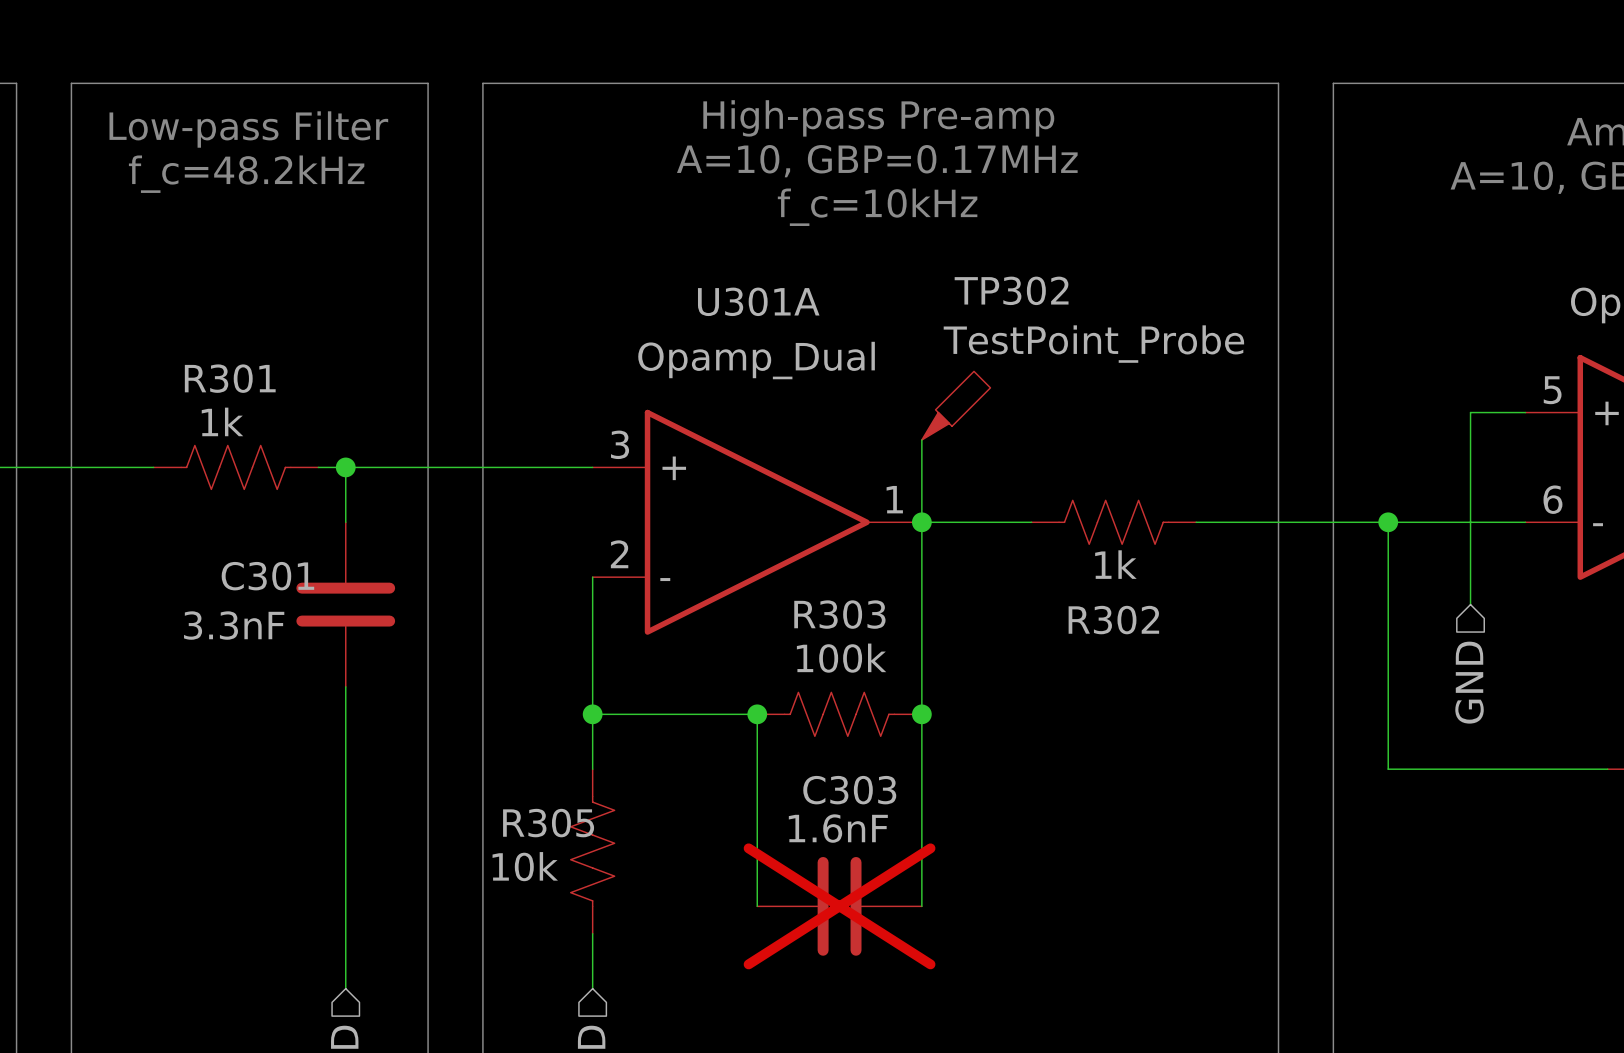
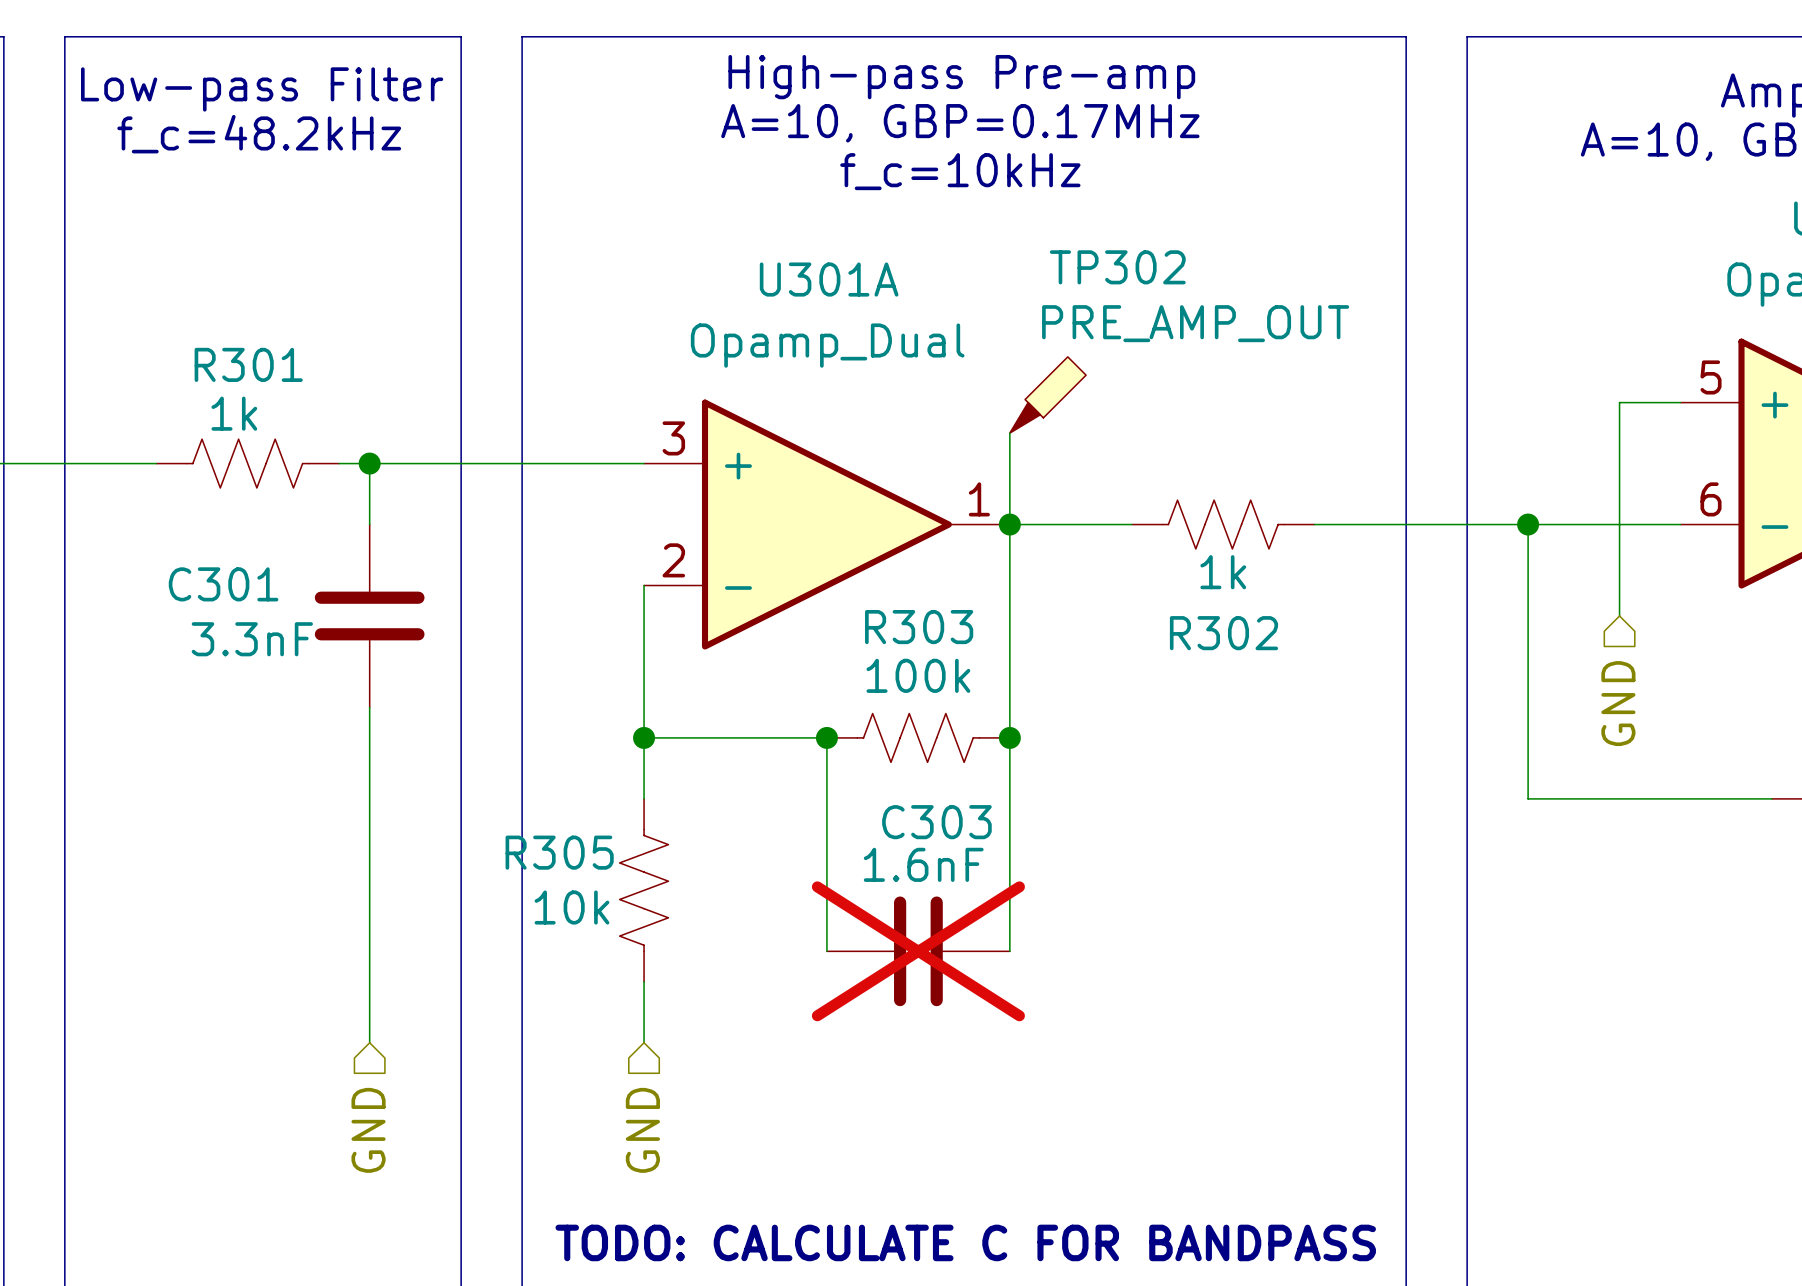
TP302 value: TestPoint_Probe (1093, 344) -> PRE_AMP_OUT (1195, 323)
C301 name position: C301 (267, 576) -> C301 (223, 584)
R305 name position: R305 (548, 823) -> R305 (559, 852)

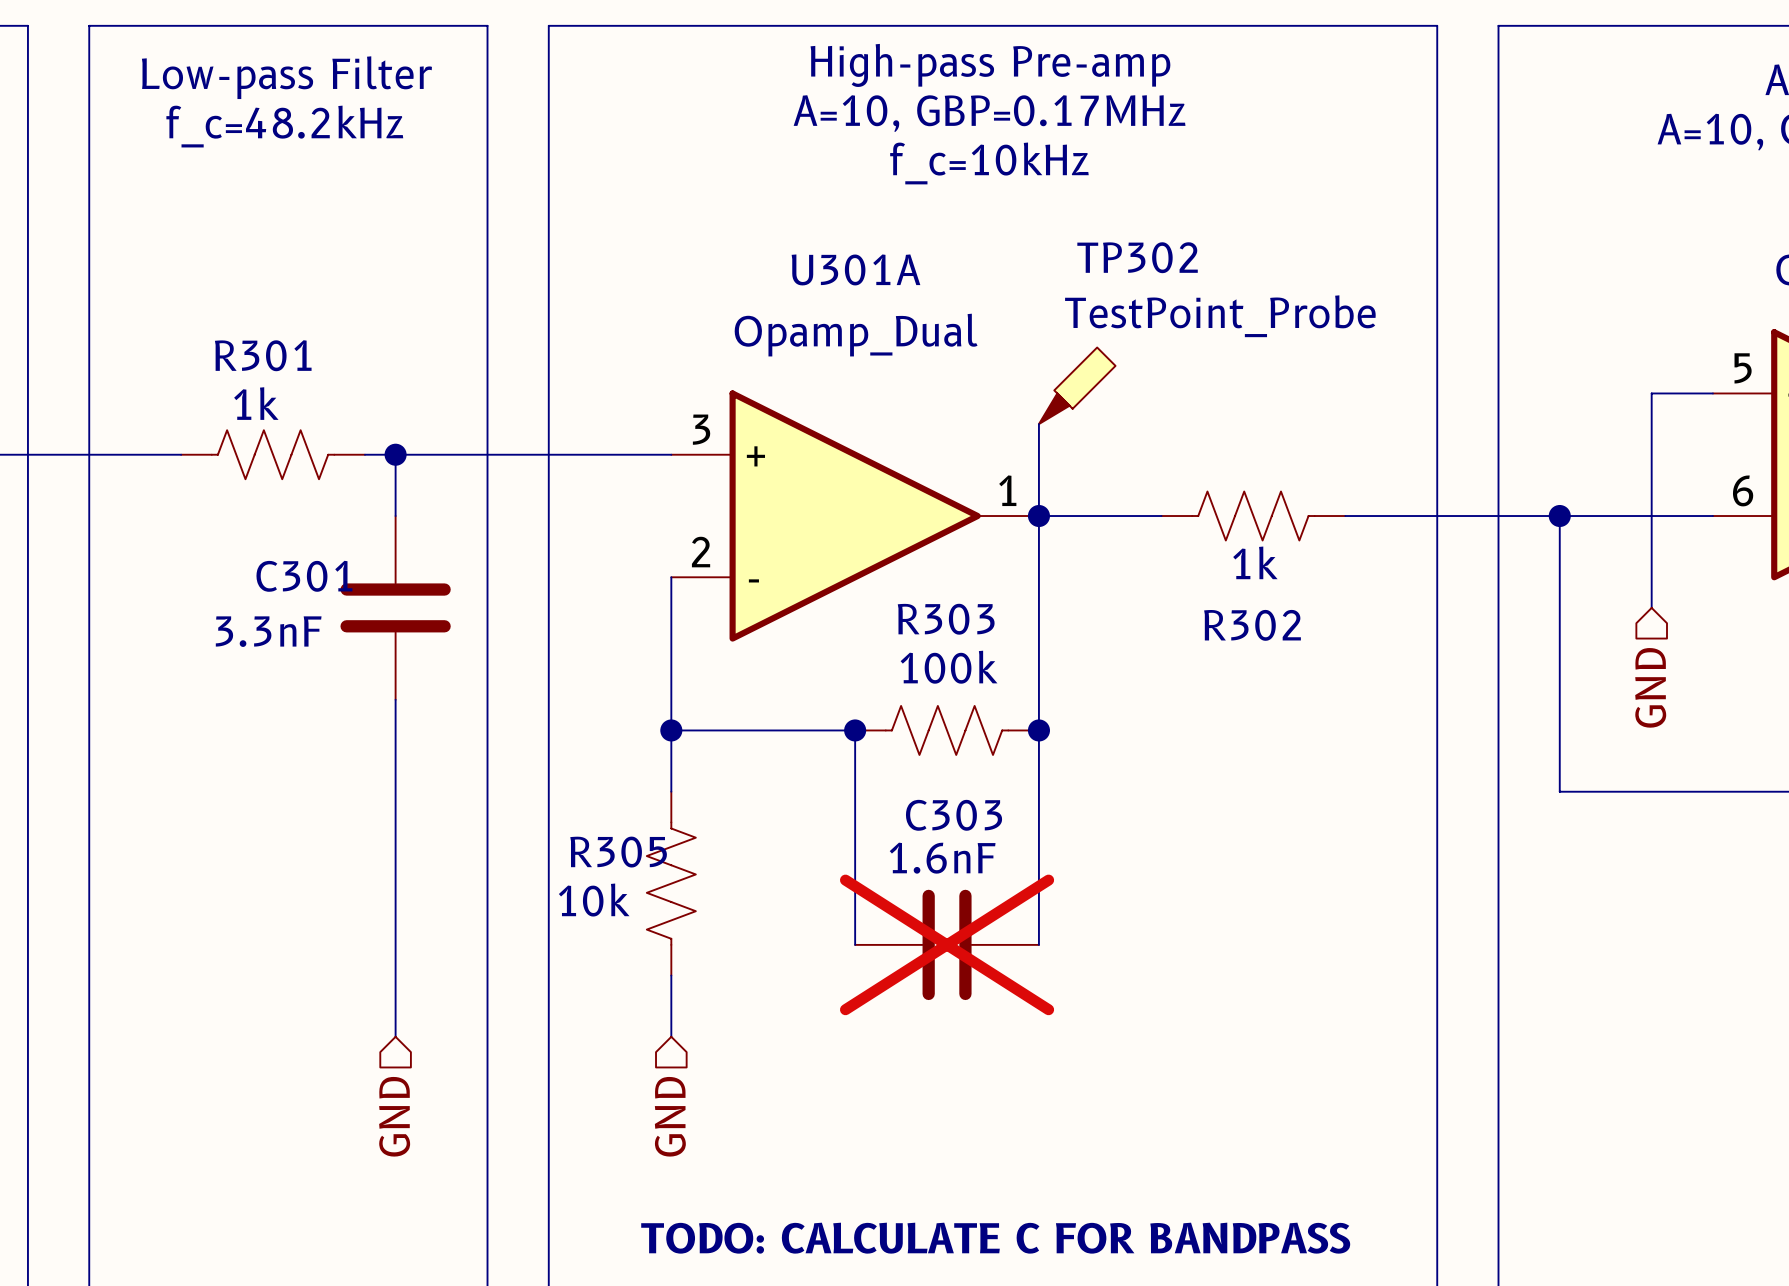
TP302 value: PRE_AMP_OUT (1195, 323) -> TestPoint_Probe (1220, 316)
C301 name position: C301 (223, 584) -> C301 (304, 576)
R305 name position: R305 (559, 852) -> R305 (618, 852)

